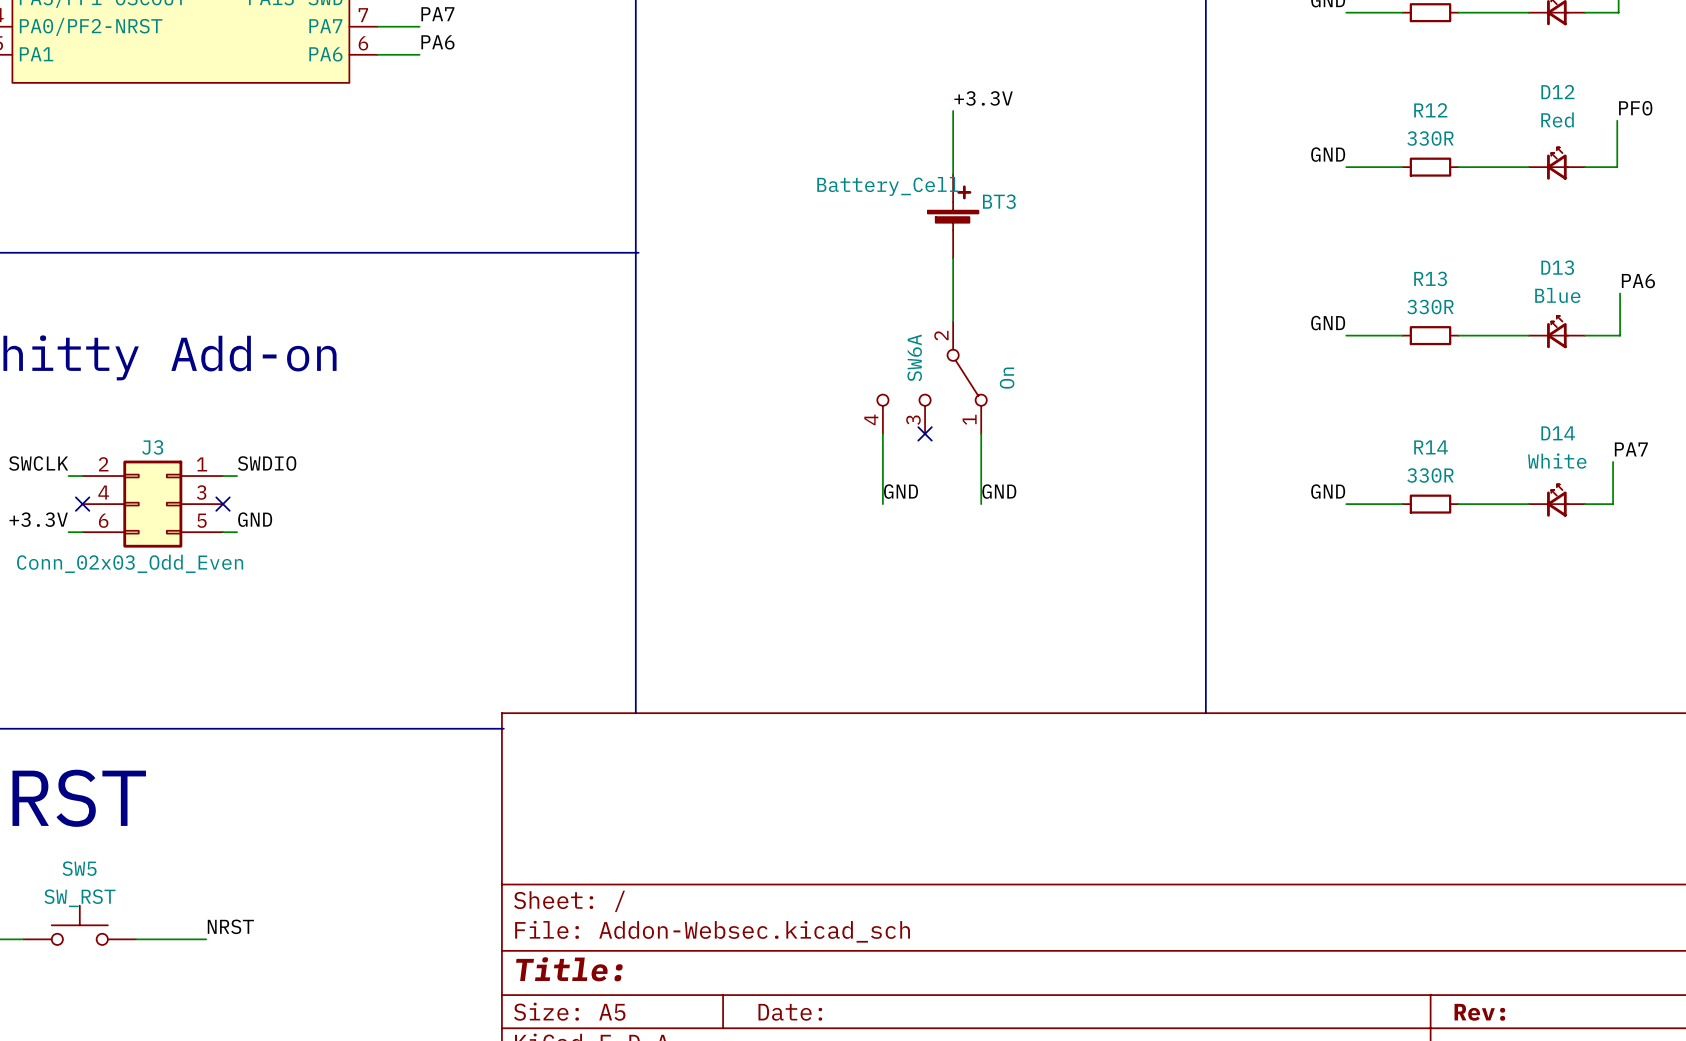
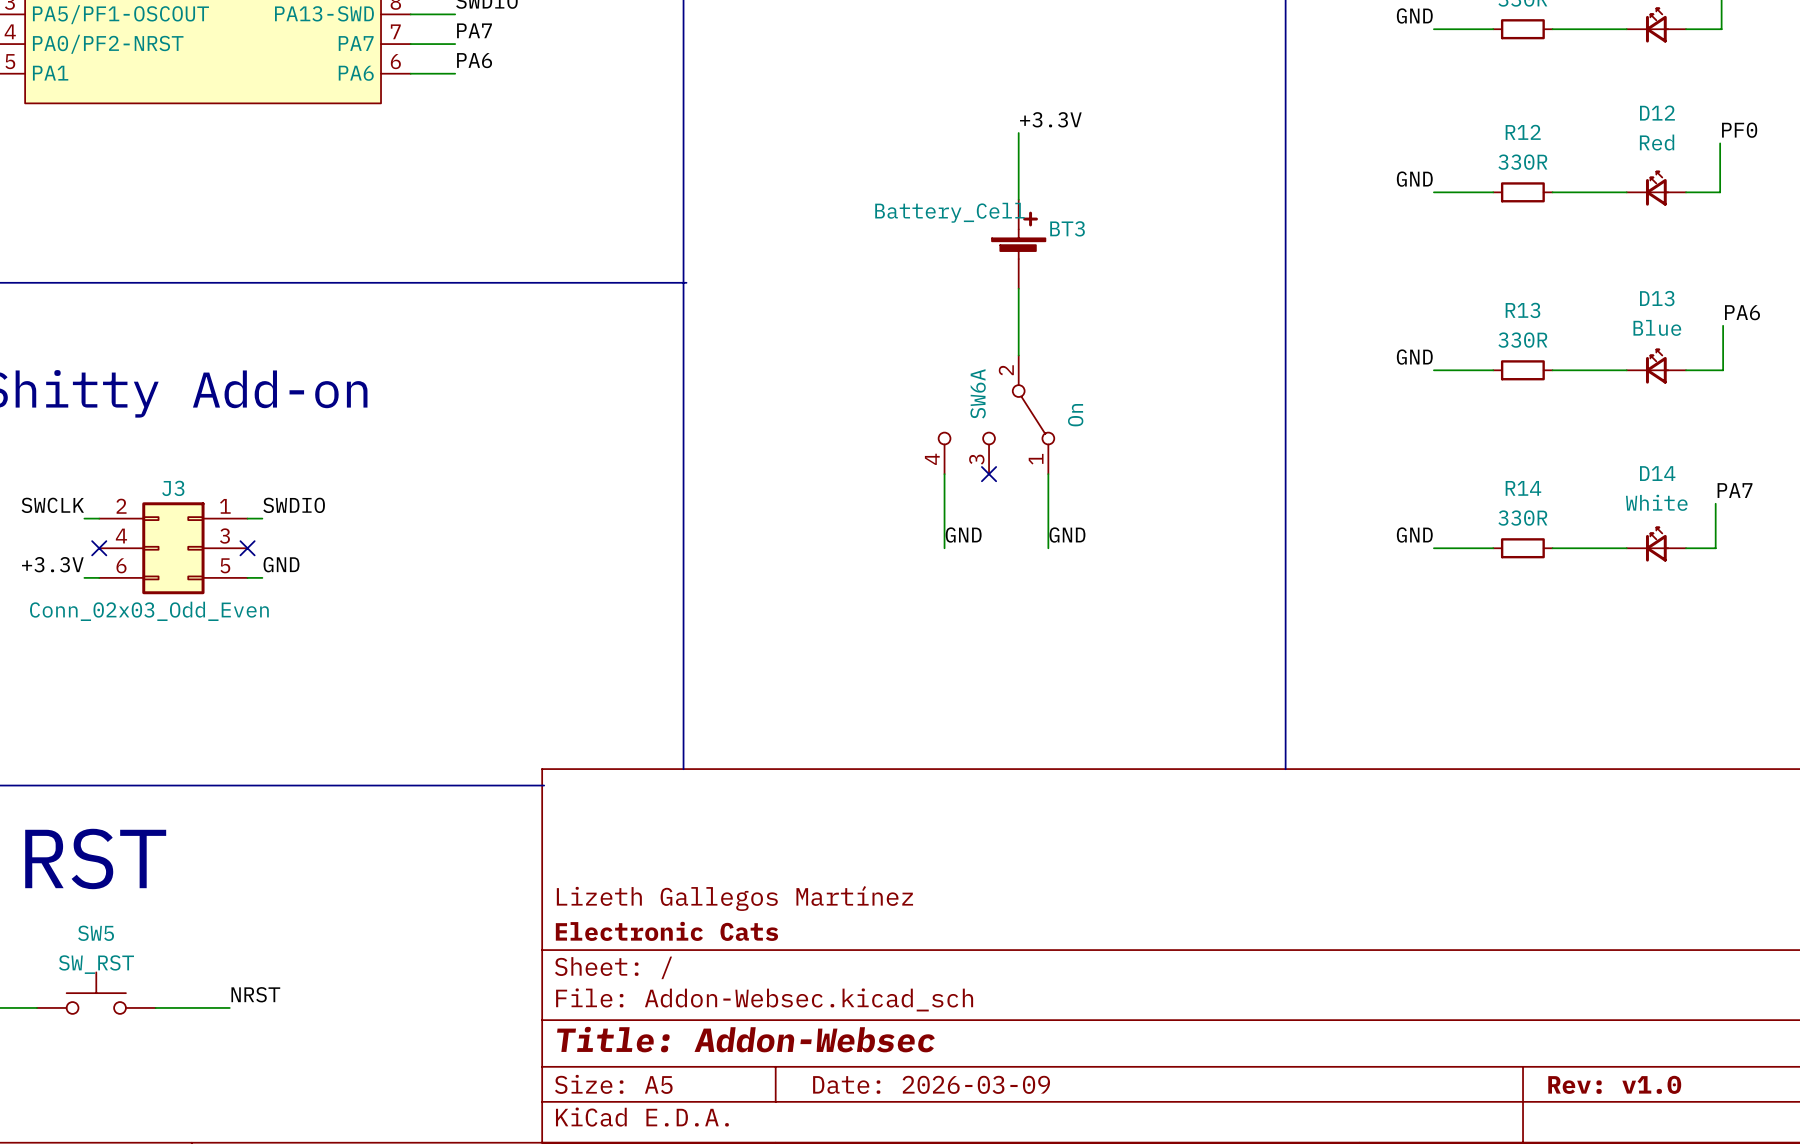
title block: none -> Lizeth Gallegos Martínez (734, 898)
title block: none -> Electronic Cats (666, 931)
title block: Title: (569, 969) -> Title: Addon-Websec (745, 1039)
title block: Date: (790, 1012) -> Date: 2026-03-09 (931, 1084)
title block: Rev: (1479, 1012) -> Rev: v1.0 (1614, 1084)

